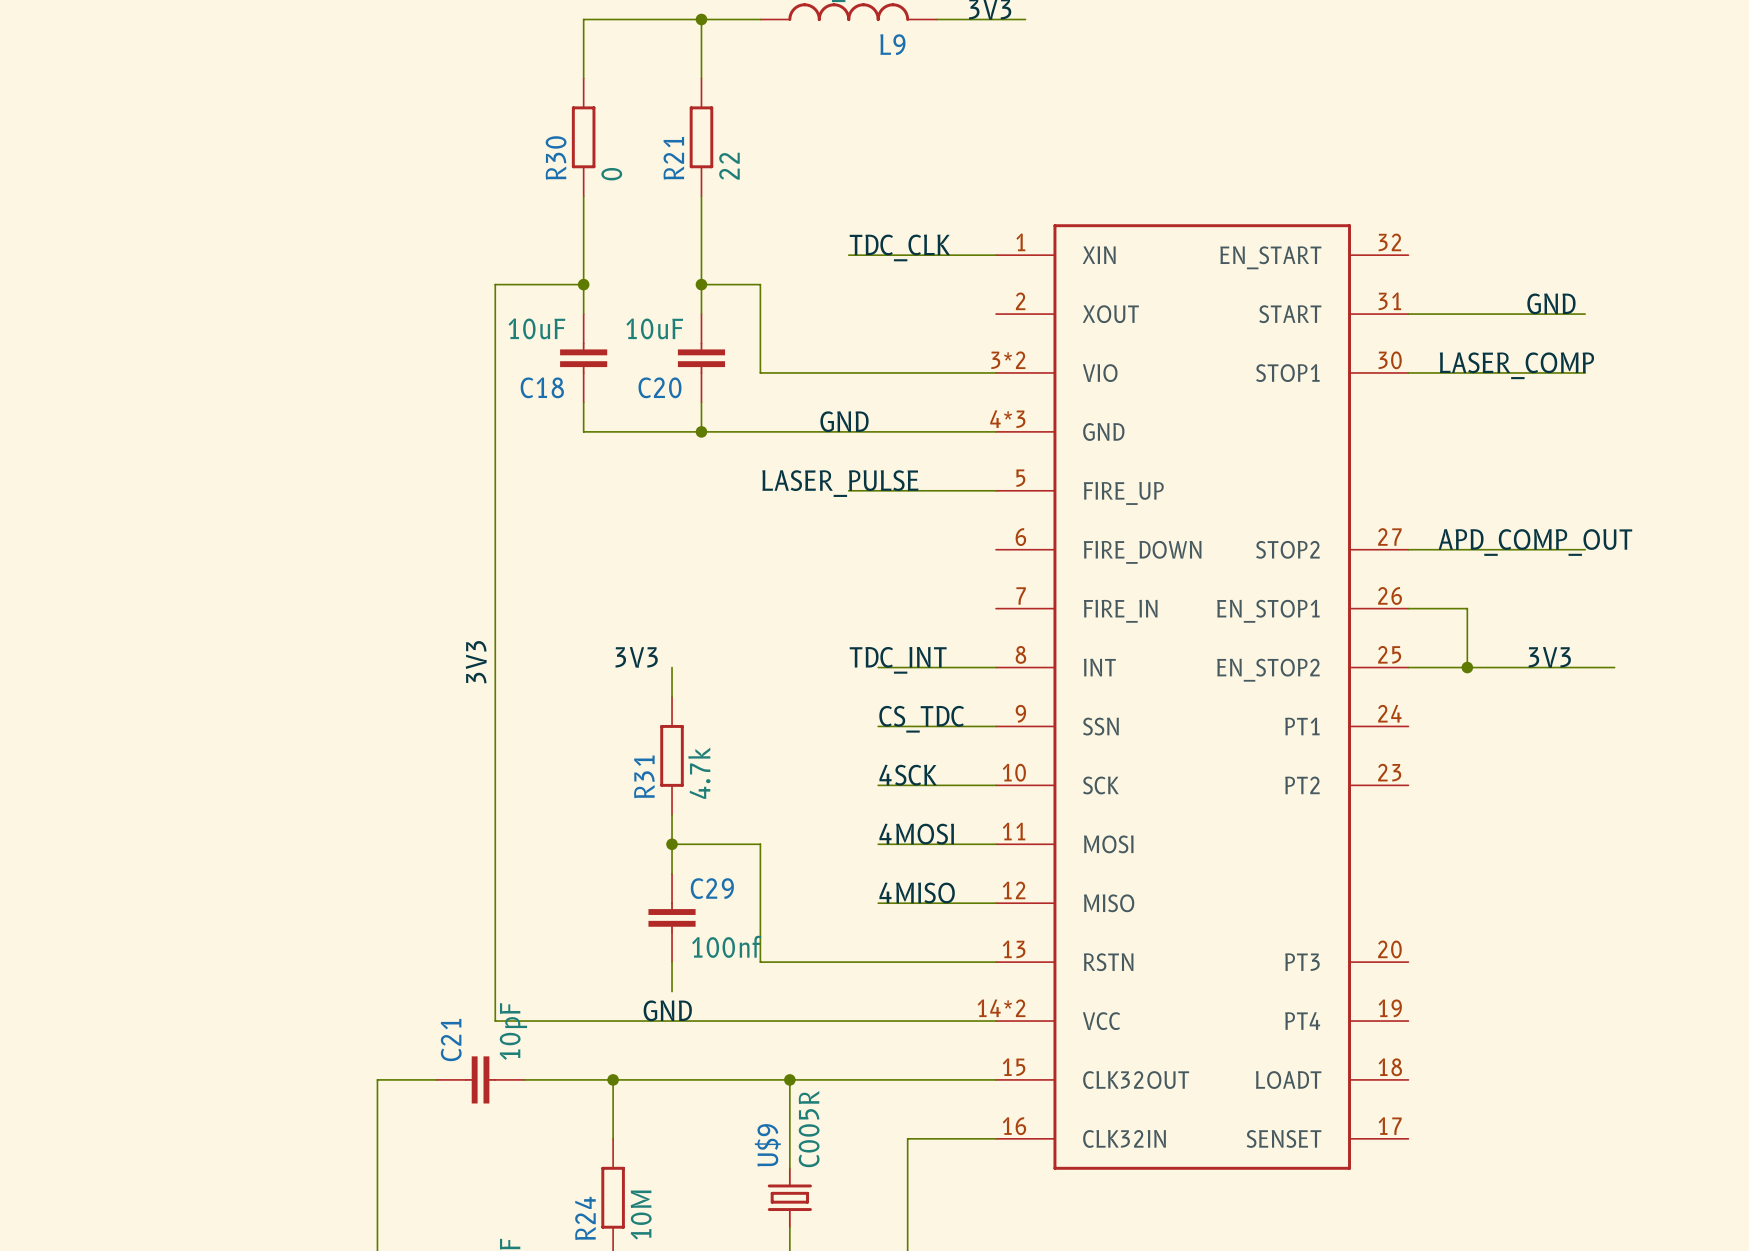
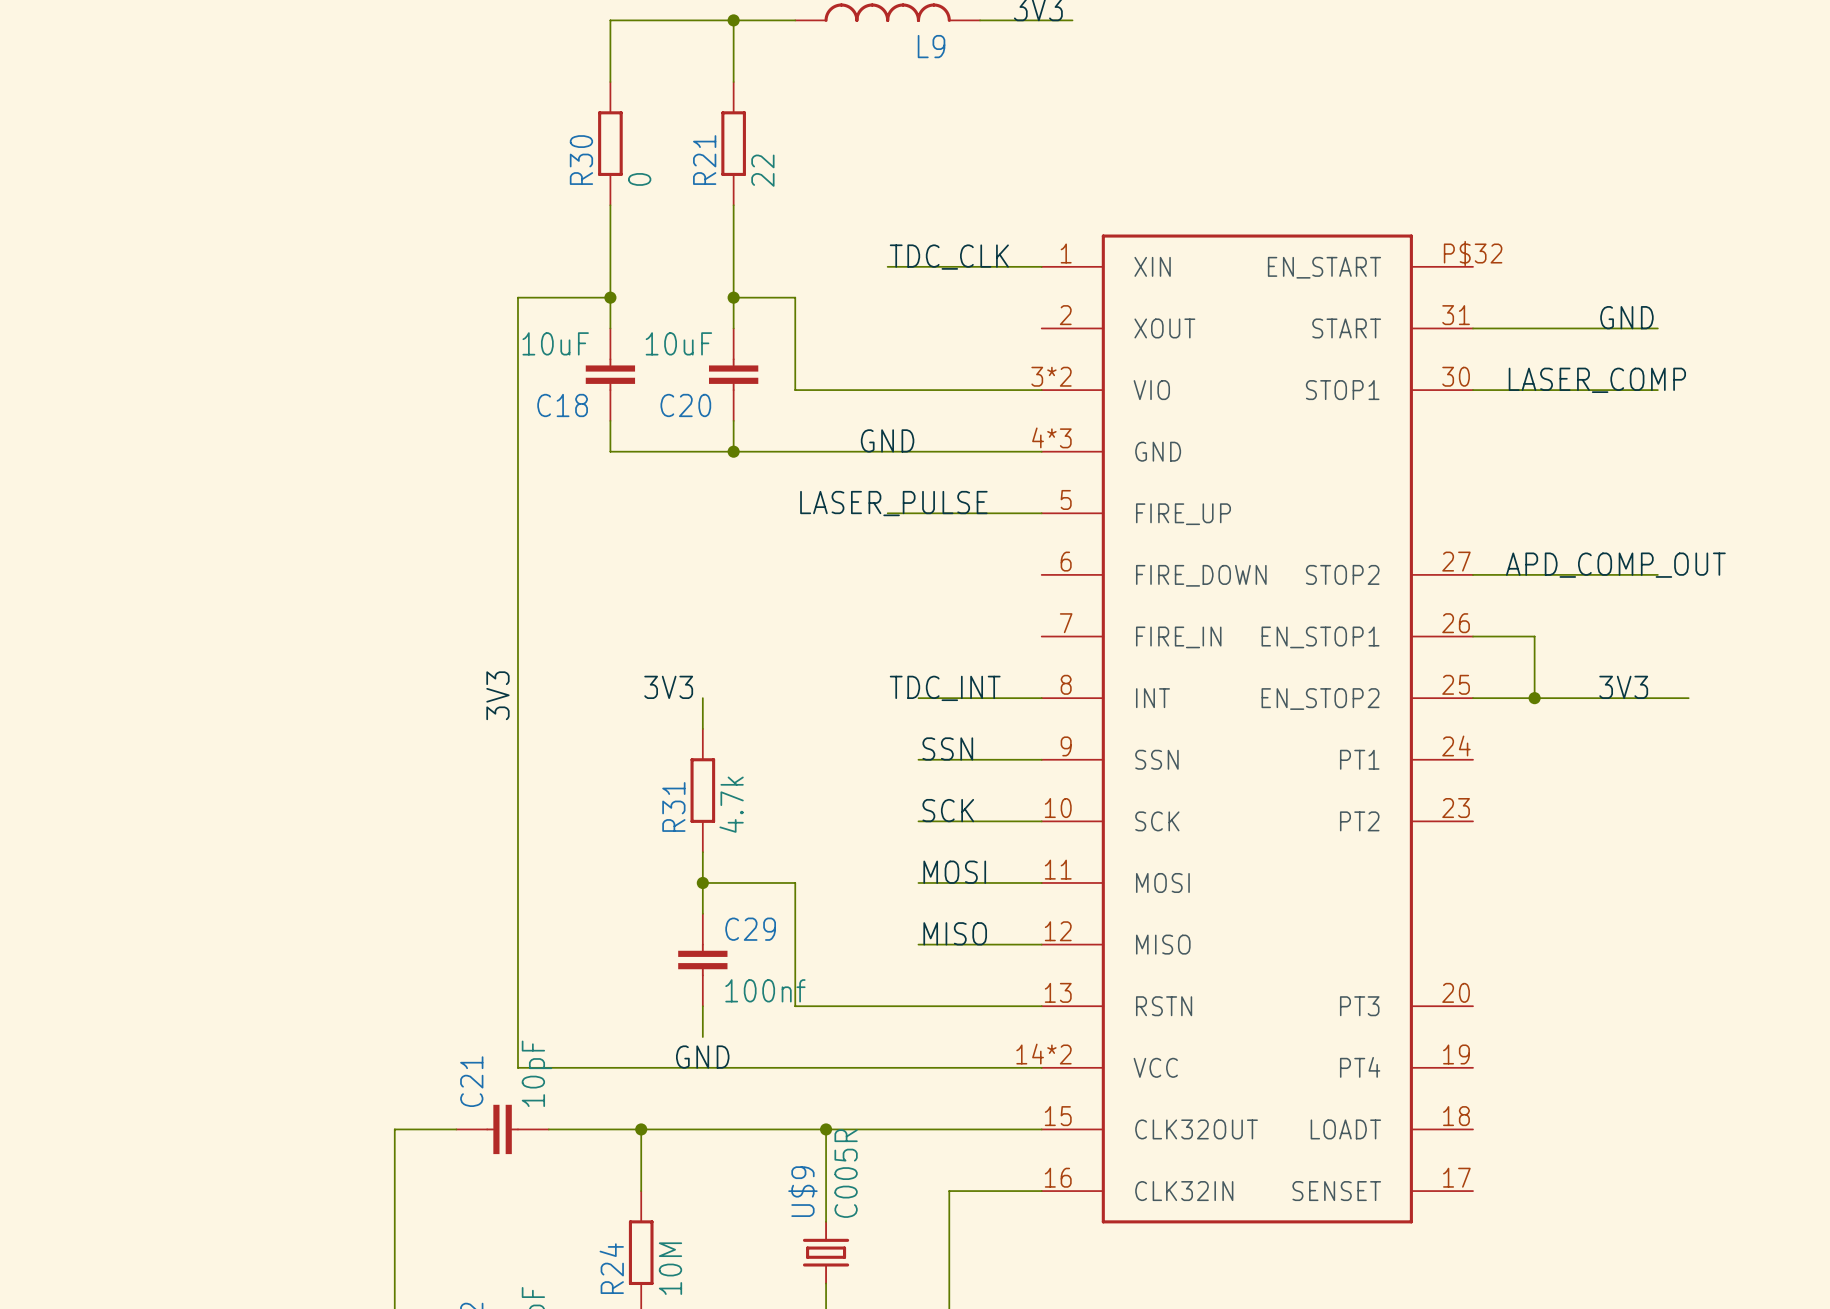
part pin number: 32 (1389, 242) -> P$32 (1473, 253)
label: CS_TDC (921, 719) -> SSN (947, 748)
label: 4SCK (908, 775) -> SCK (948, 810)
label: 4MOSI (916, 834) -> MOSI (954, 872)
label: 4MISO (917, 892) -> MISO (955, 933)

